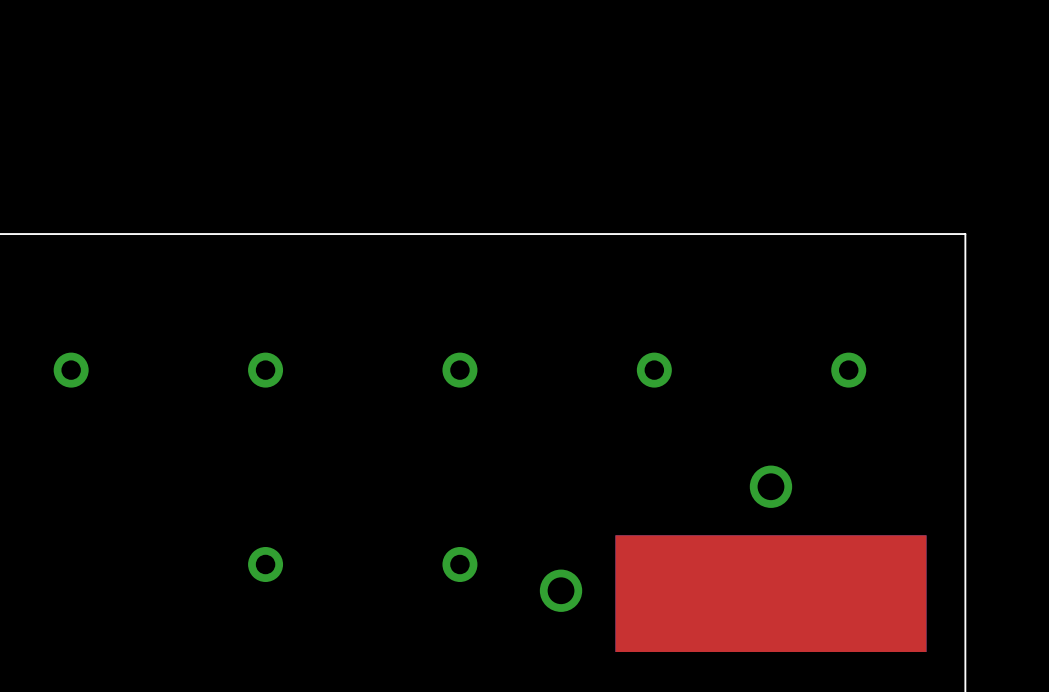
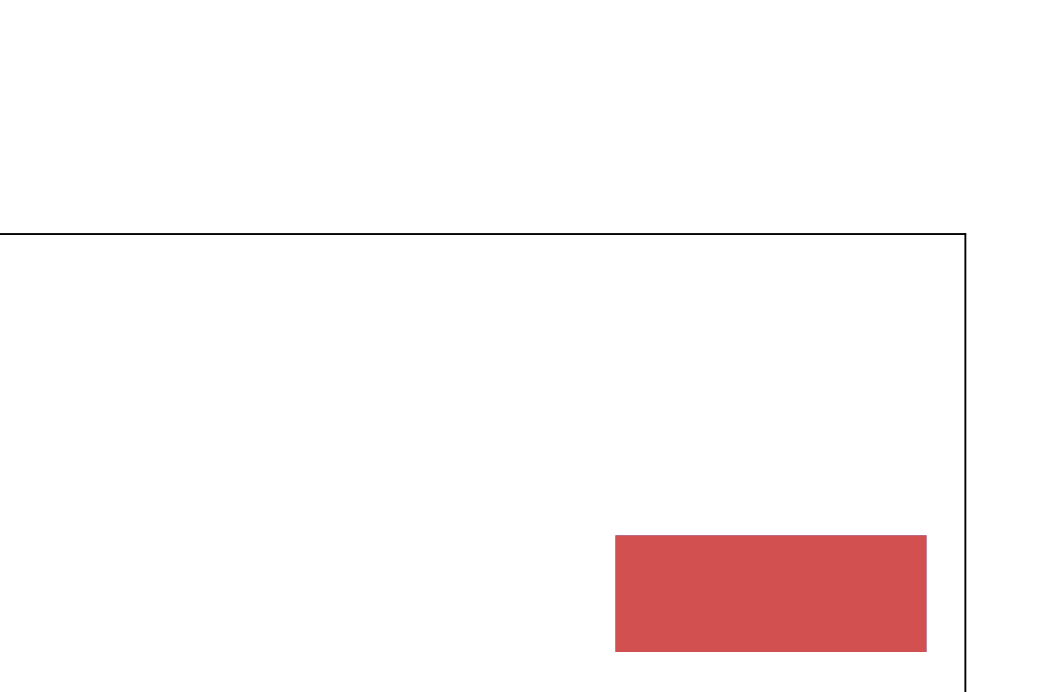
via: (71, 370) -> none
via: (265, 370) -> none
via: (459, 370) -> none
via: (654, 370) -> none
via: (848, 370) -> none
via: (770, 486) -> none
via: (265, 564) -> none
via: (459, 564) -> none
via: (561, 590) -> none

